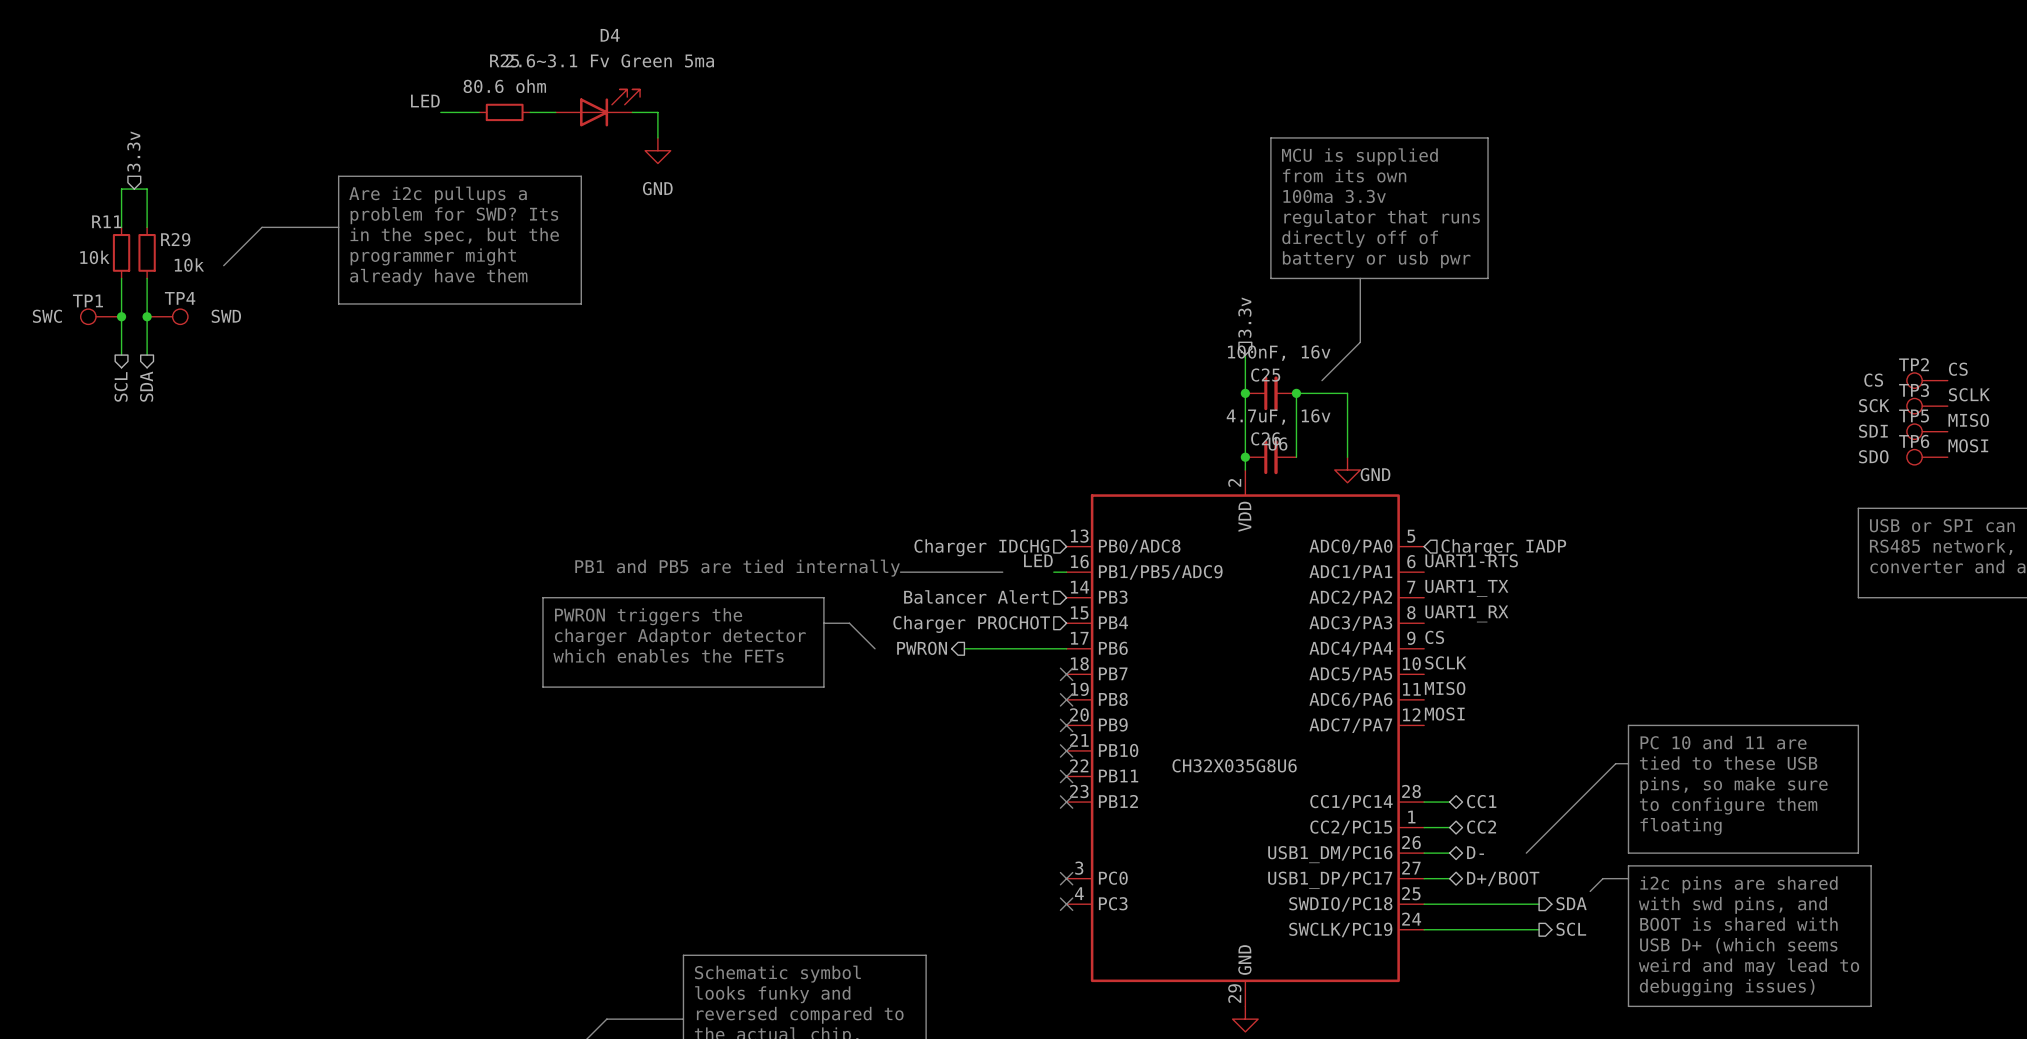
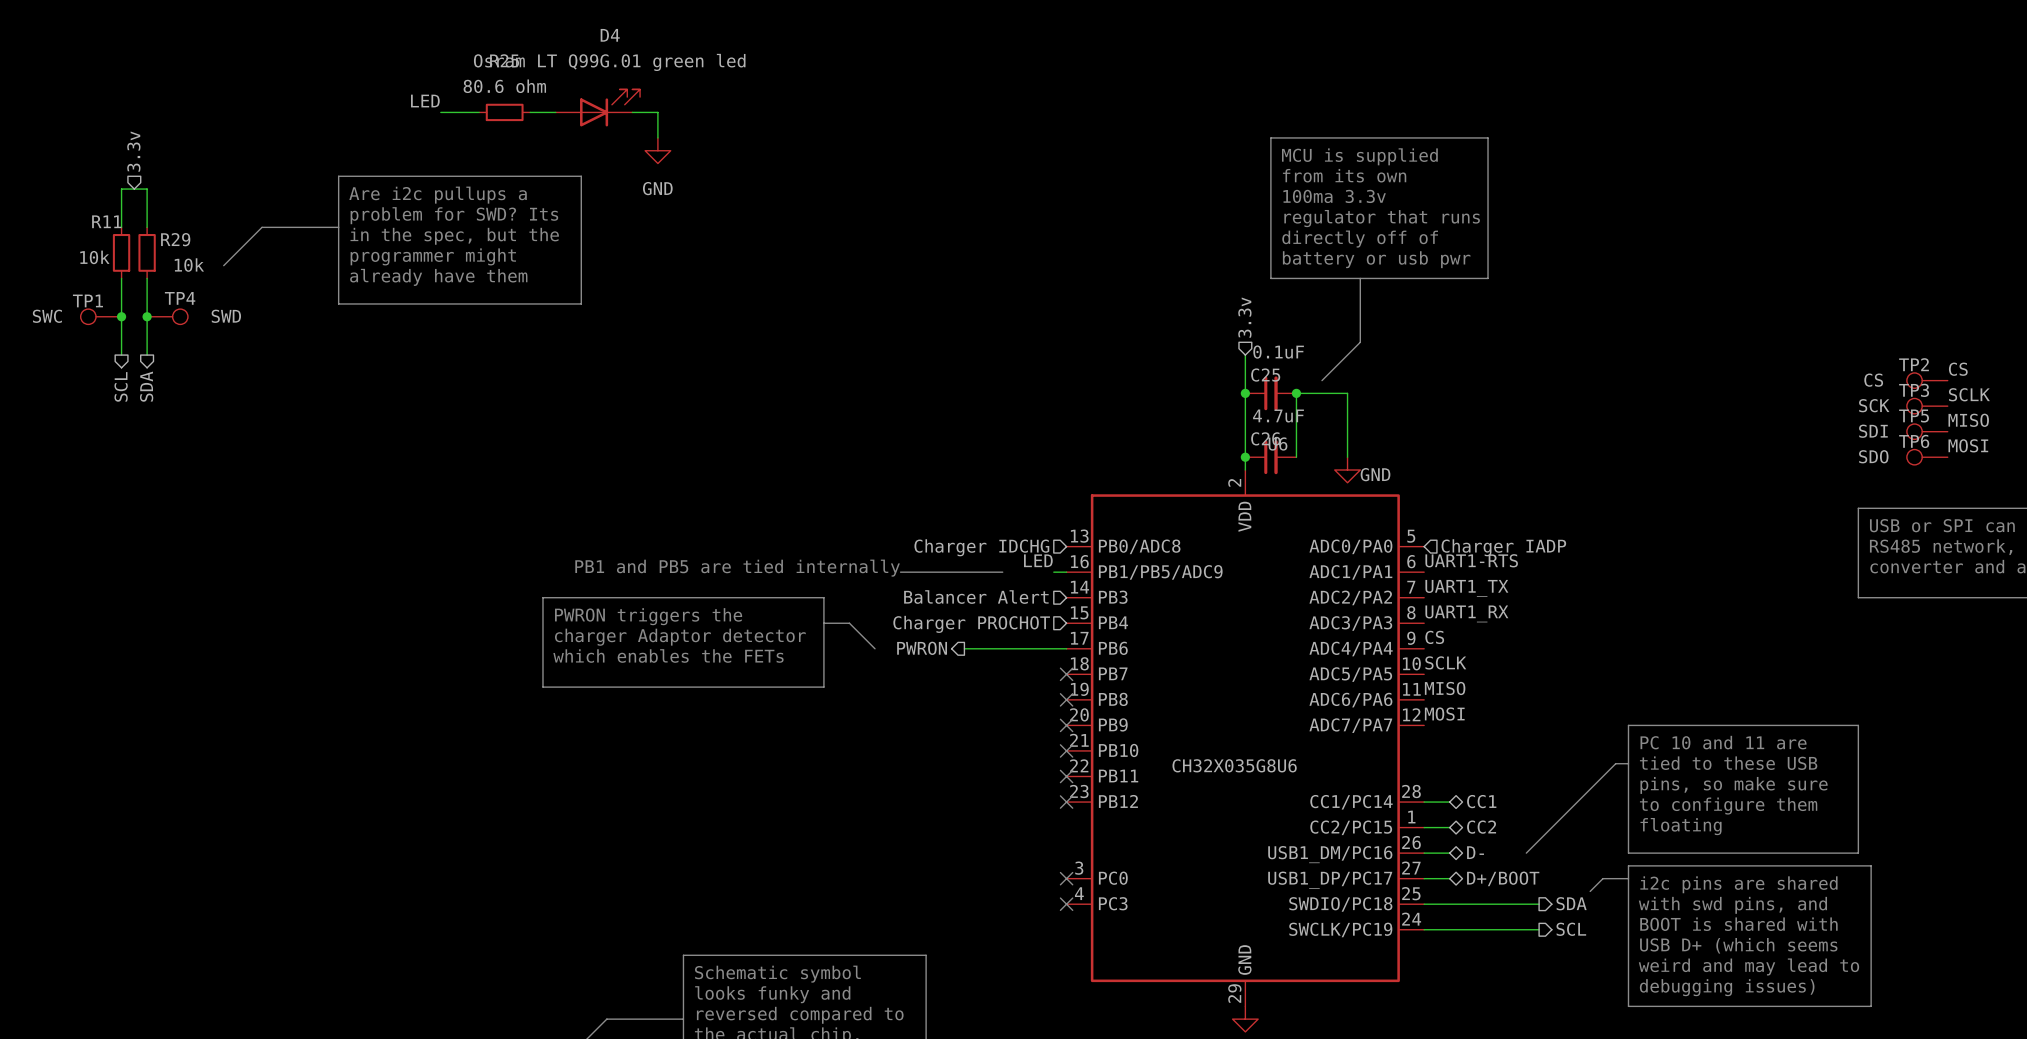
D4 value: 2.6~3.1 Fv Green 5ma (609, 60) -> Osram LT Q99G.01 green led (609, 62)
C25 value: 100nF, 16v (1279, 353) -> 0.1uF (1278, 352)
C26 value: 4.7uF, 16v (1278, 417) -> 4.7uF (1278, 416)

